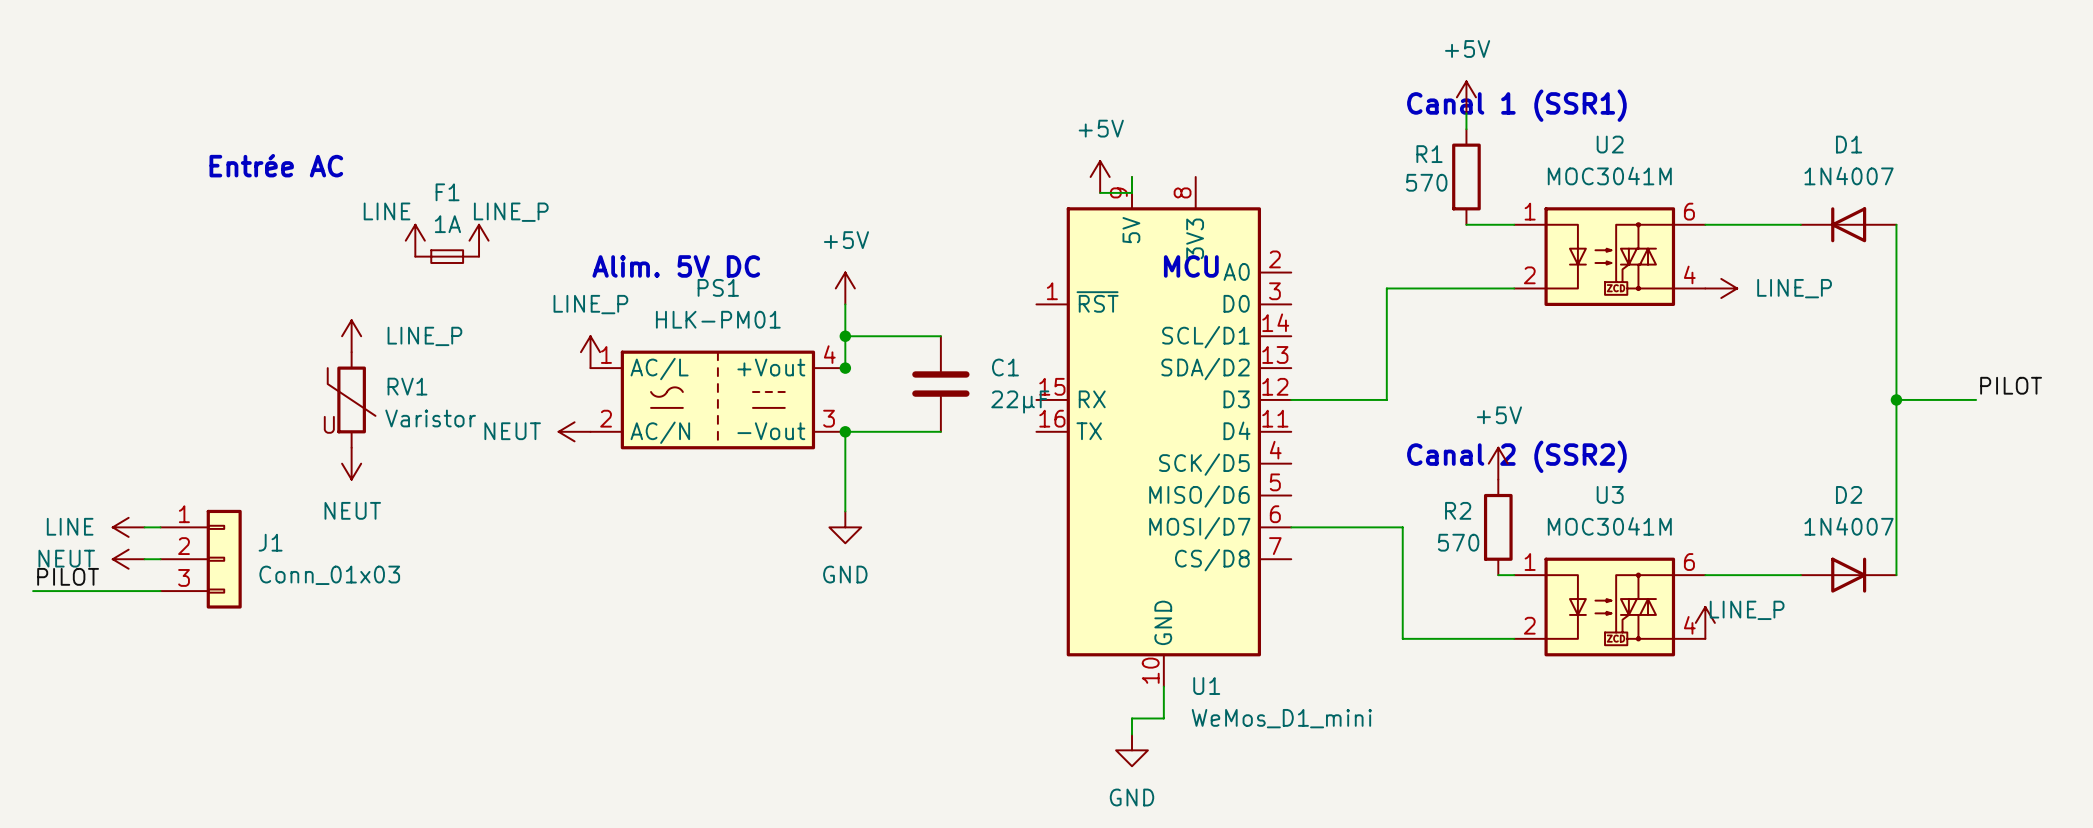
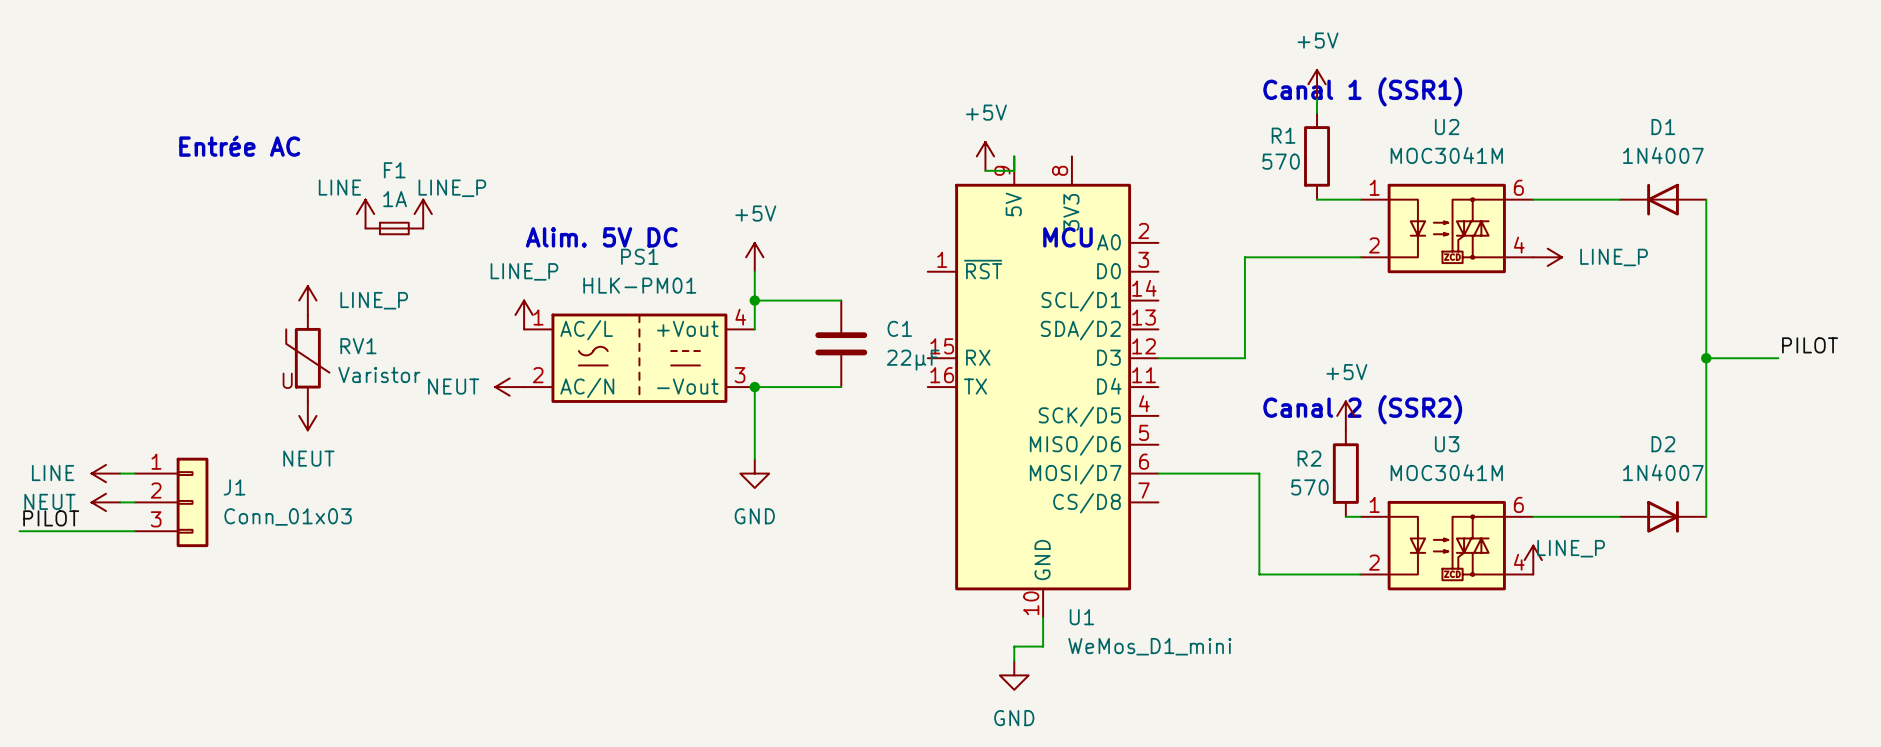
junction: (845, 368) -> none

